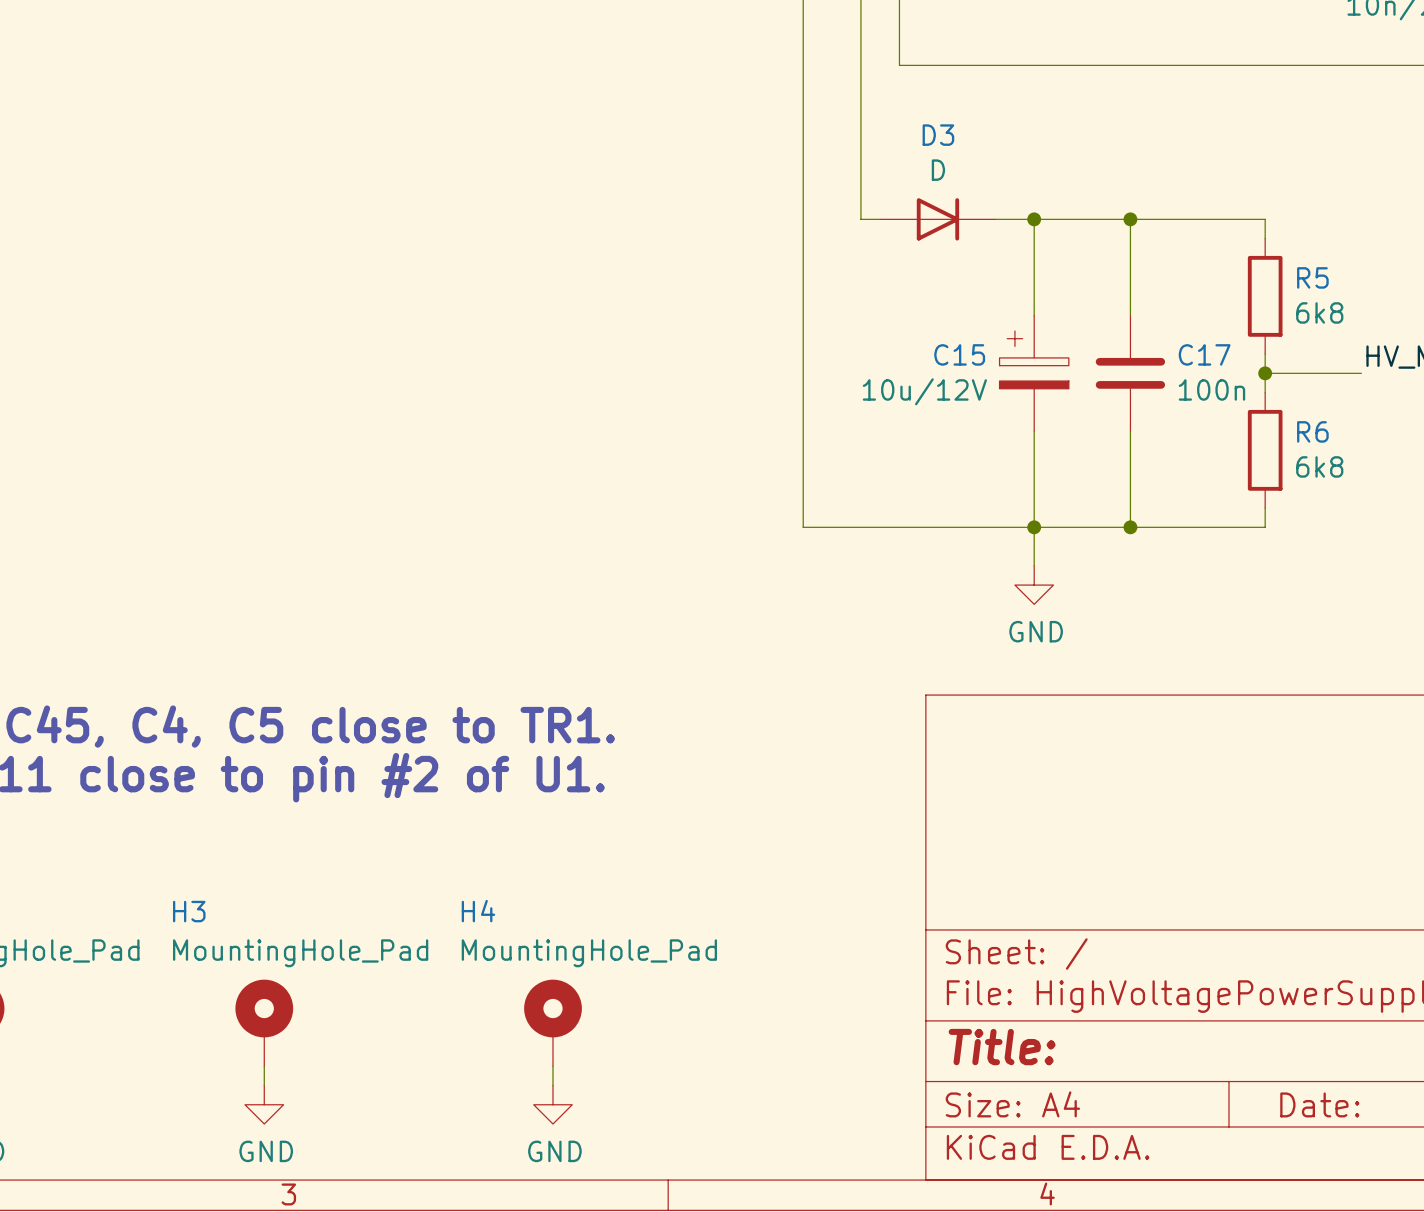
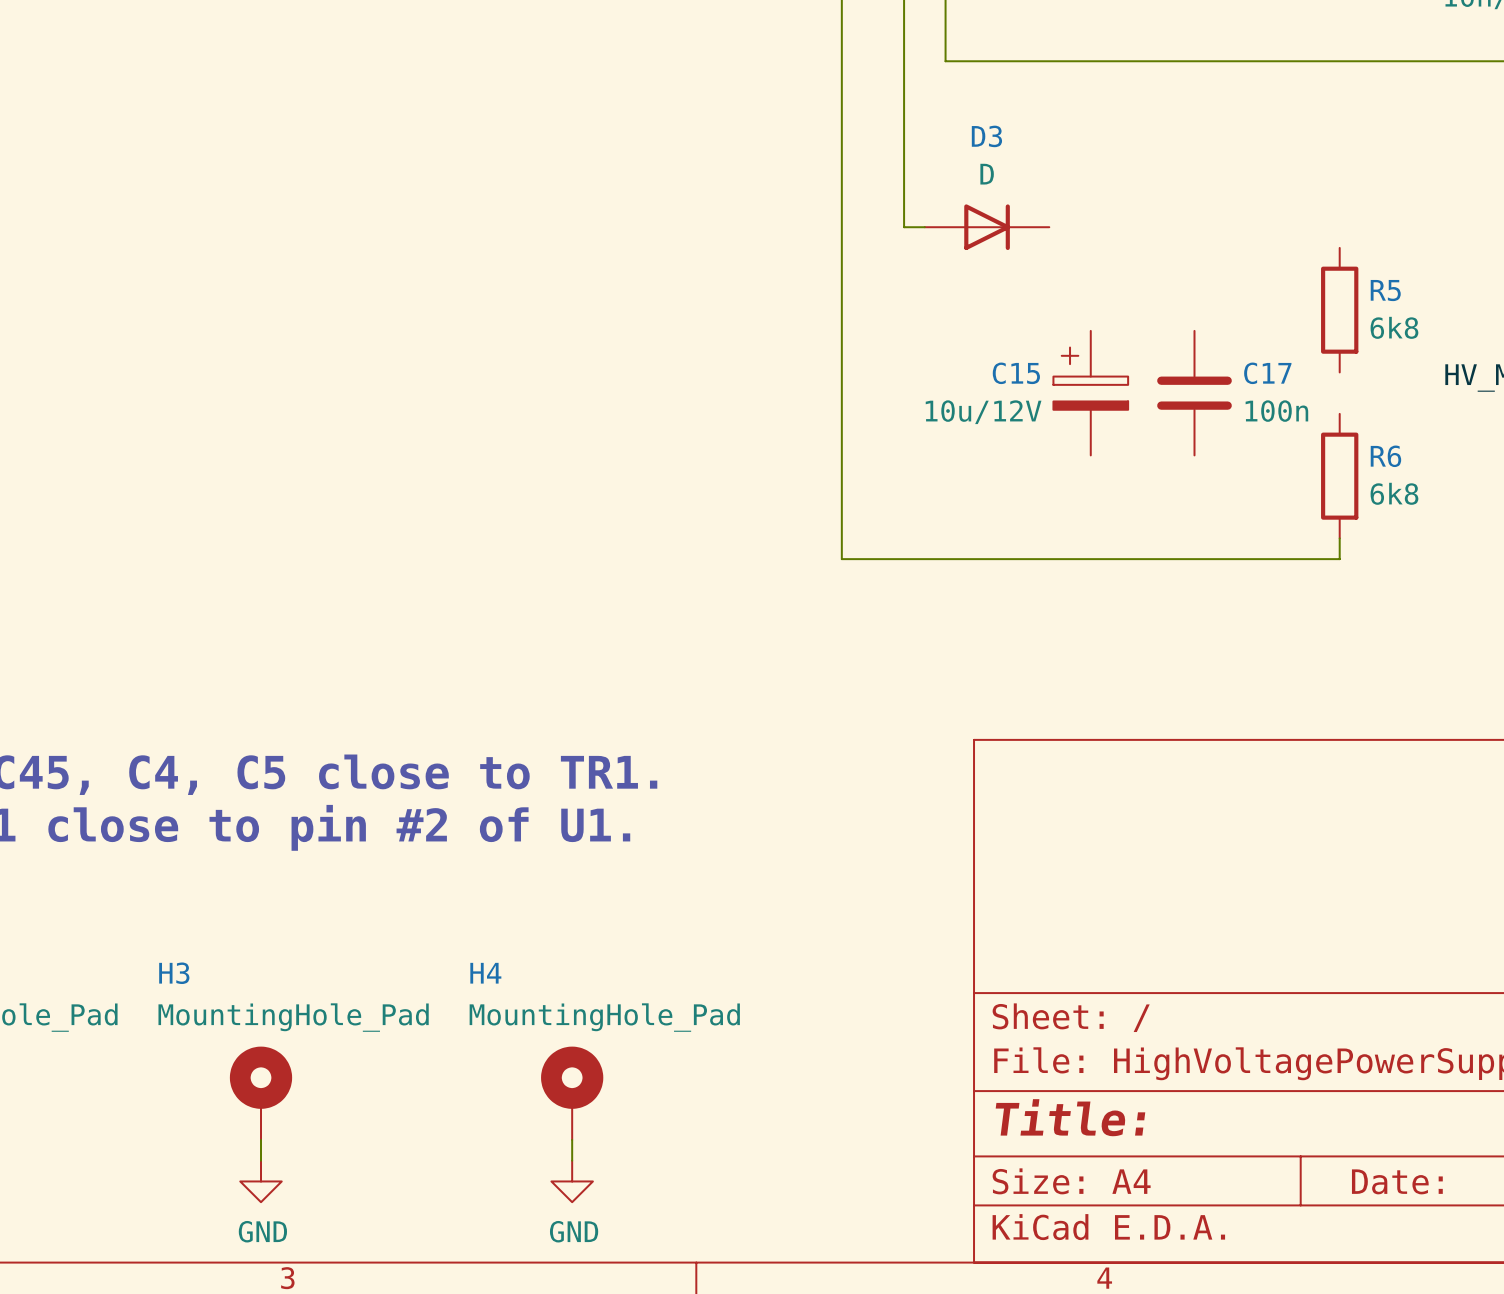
wire: (995, 219) (1265, 219) (1265, 238) -> none
wire: (1034, 219) (1034, 315) -> none
junction: (1034, 219) -> none
wire: (1130, 219) (1130, 315) -> none
junction: (1130, 219) -> none
wire: (1265, 354) (1265, 392) -> none
wire: (1265, 373) (1361, 373) -> none
junction: (1265, 373) -> none
wire: (1034, 431) (1034, 565) -> none
wire: (1130, 431) (1130, 527) -> none
junction: (1034, 527) -> none
junction: (1130, 527) -> none
power symbol: GND (1034, 585) -> none

